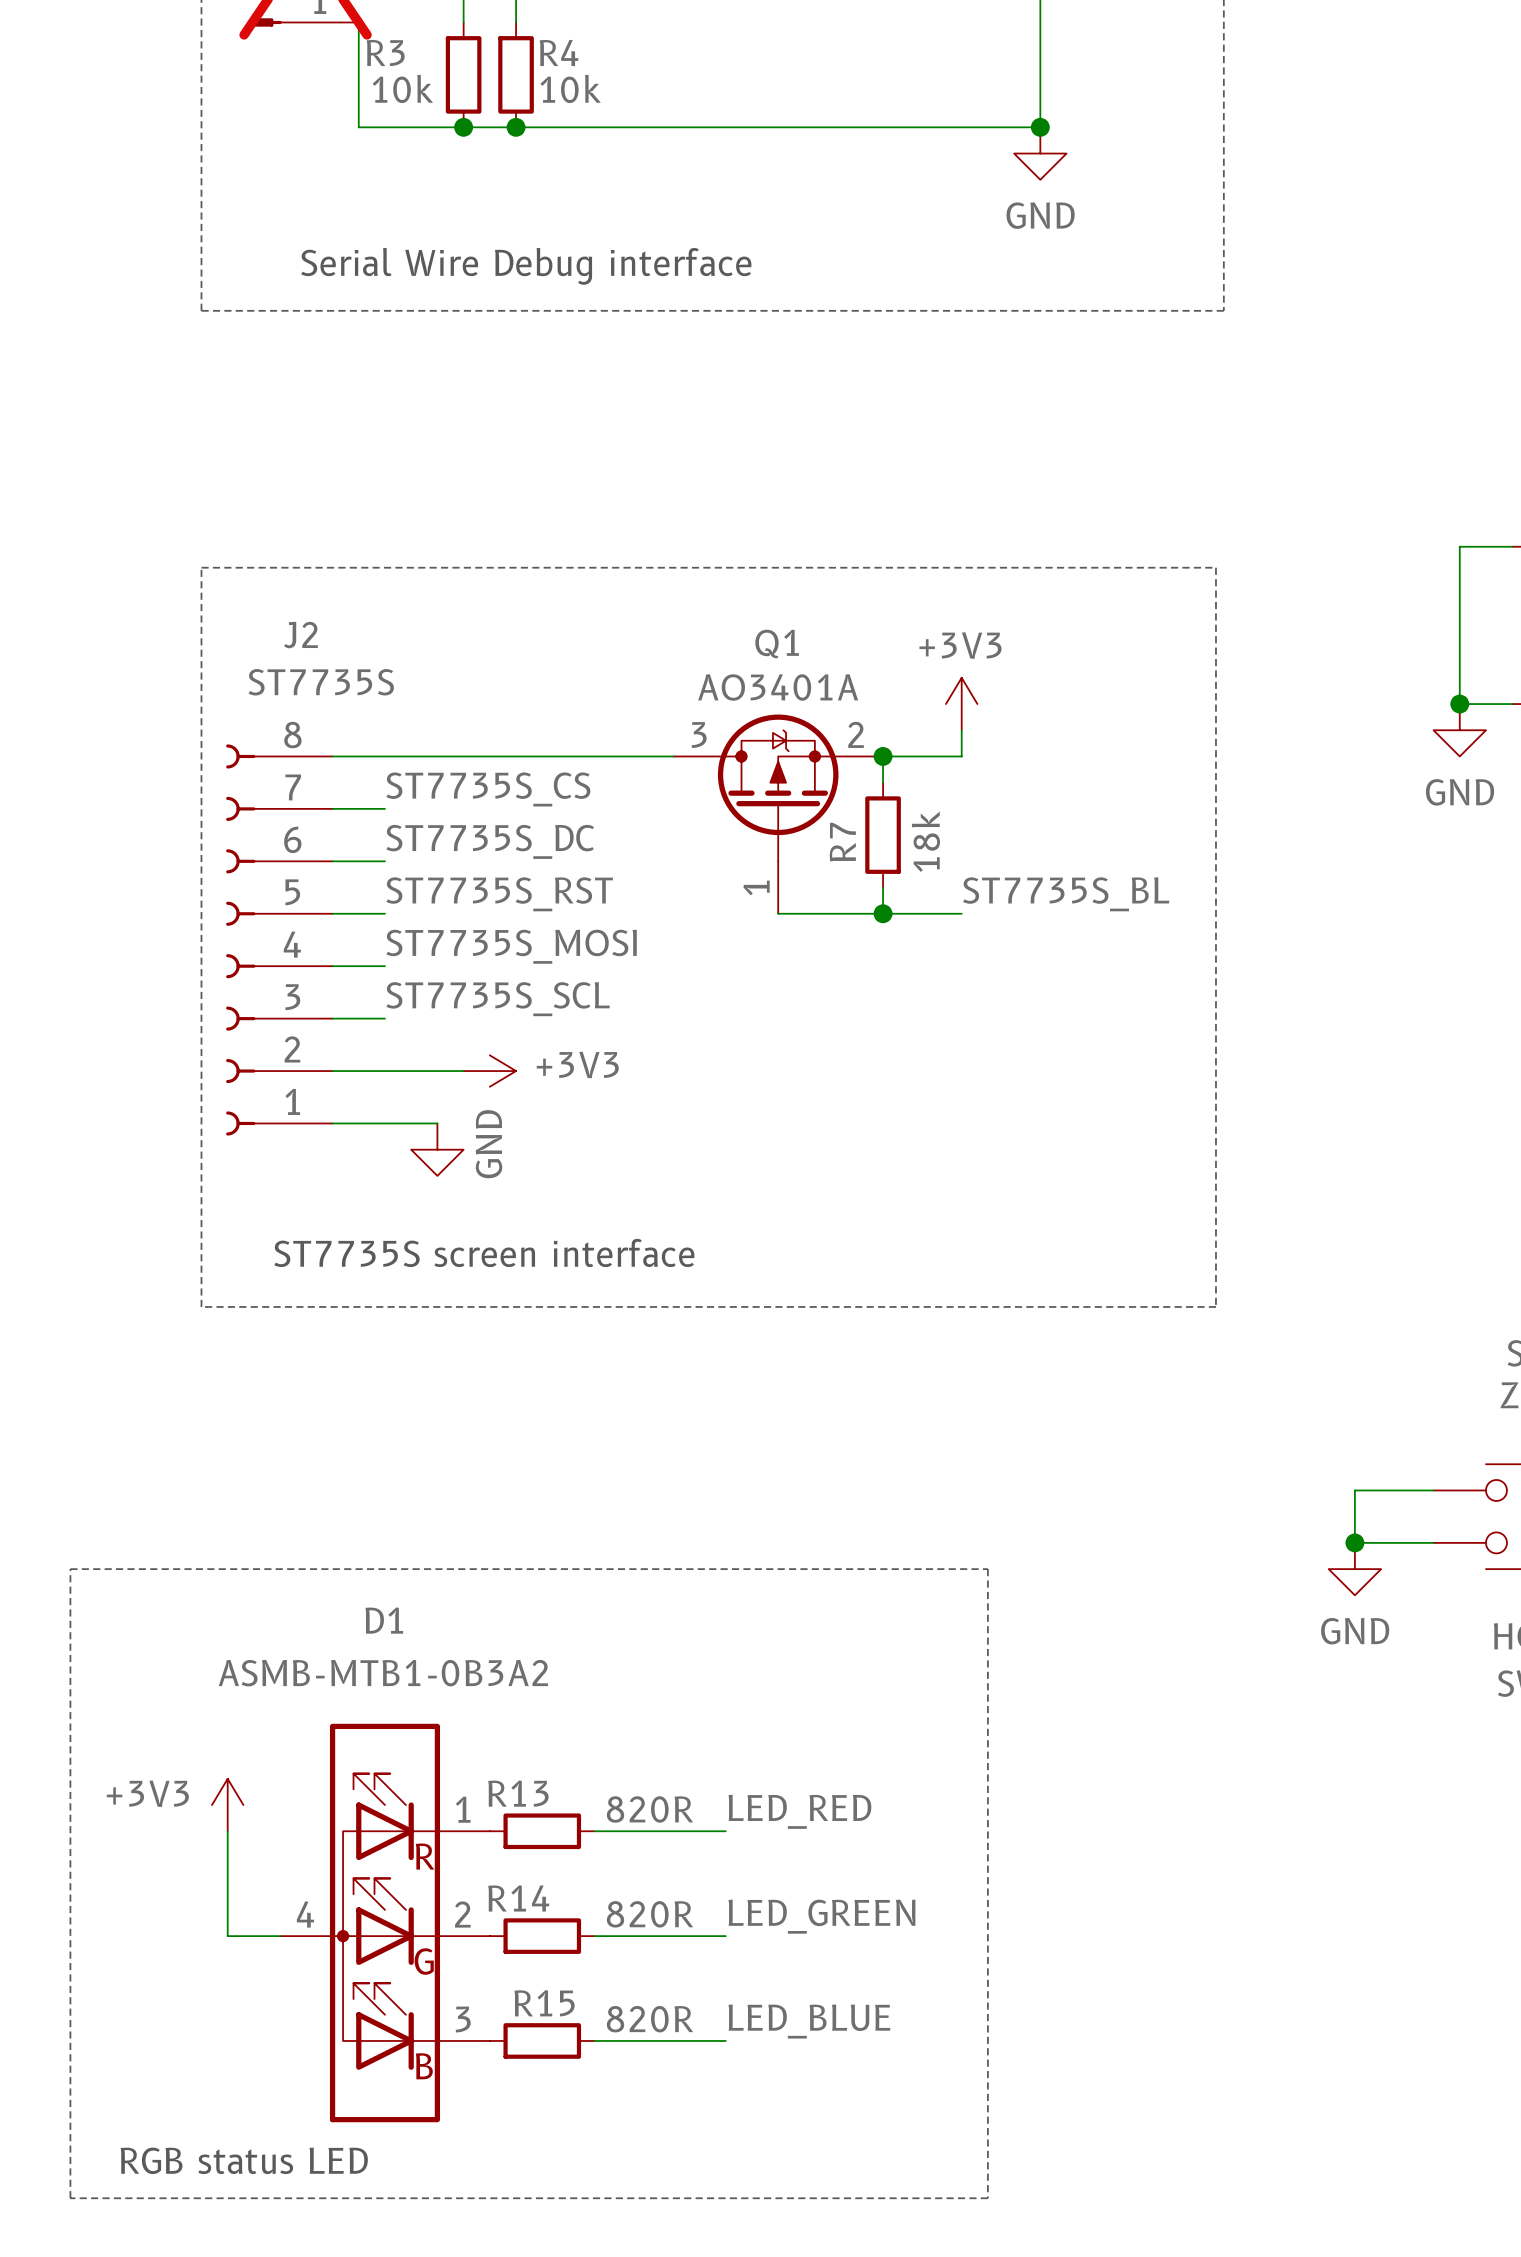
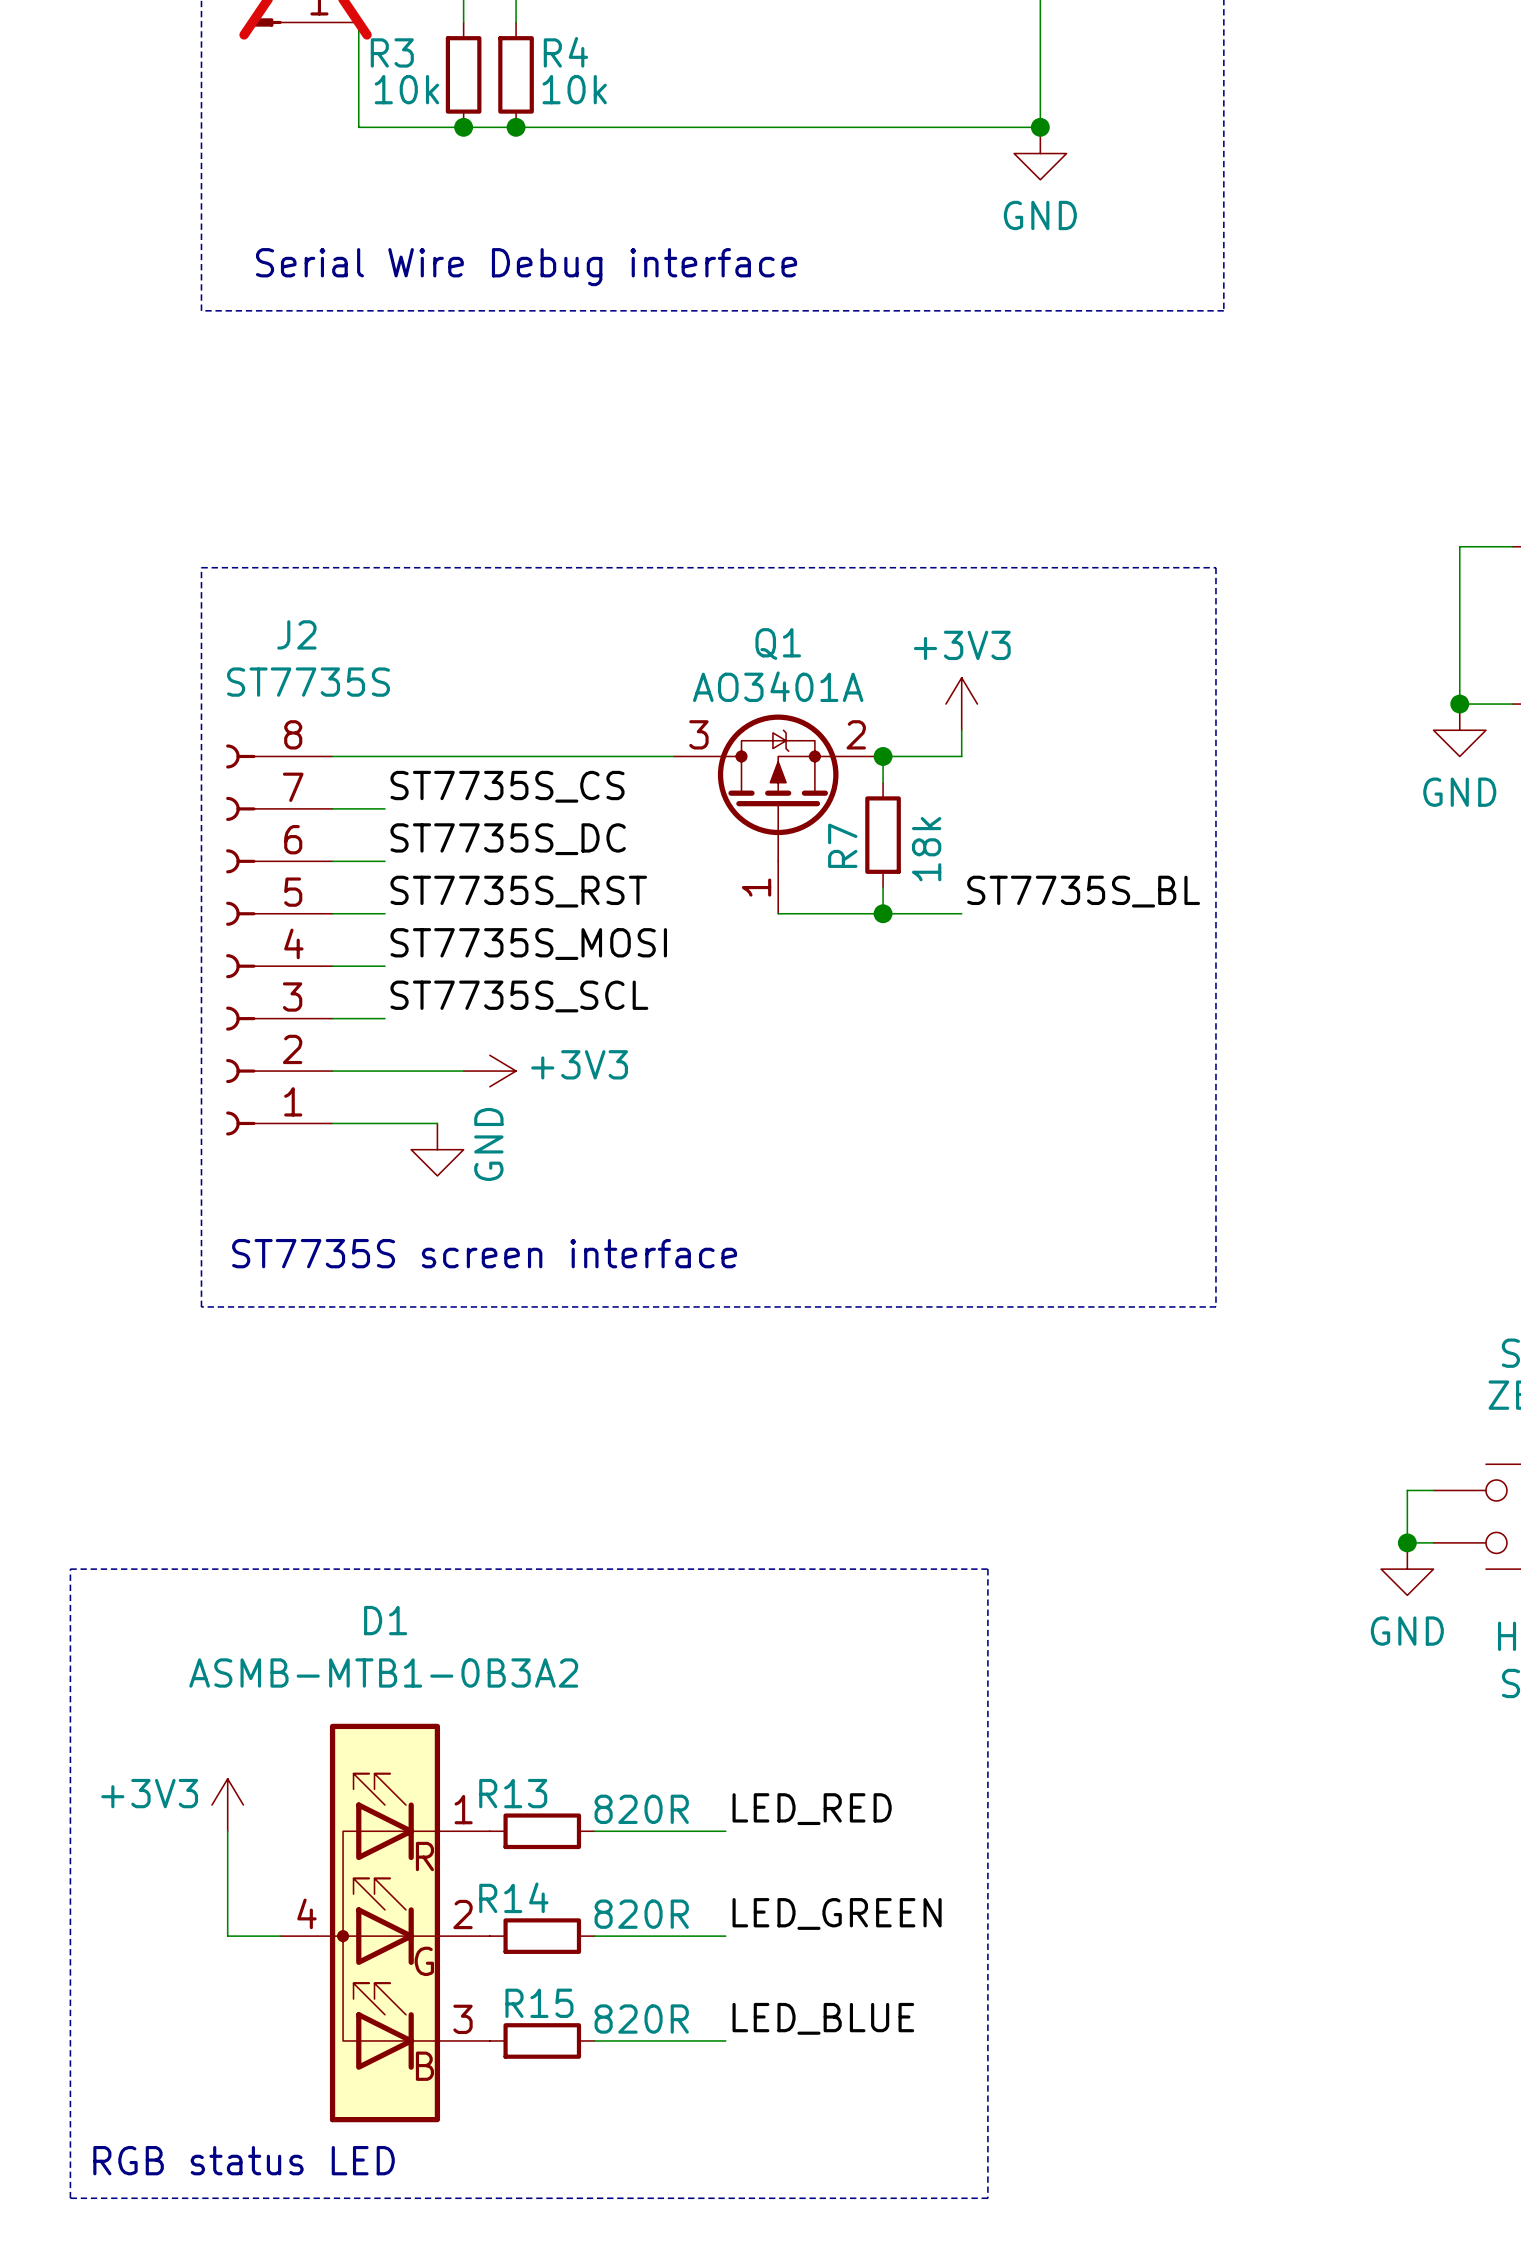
wire: (1407, 1490) (1354, 1490) (1354, 1542) (1407, 1542) -> (1407, 1490) (1407, 1542)
junction position: (1354, 1542) -> (1407, 1542)
power symbol position: GND (1354, 1569) -> GND (1407, 1569)

